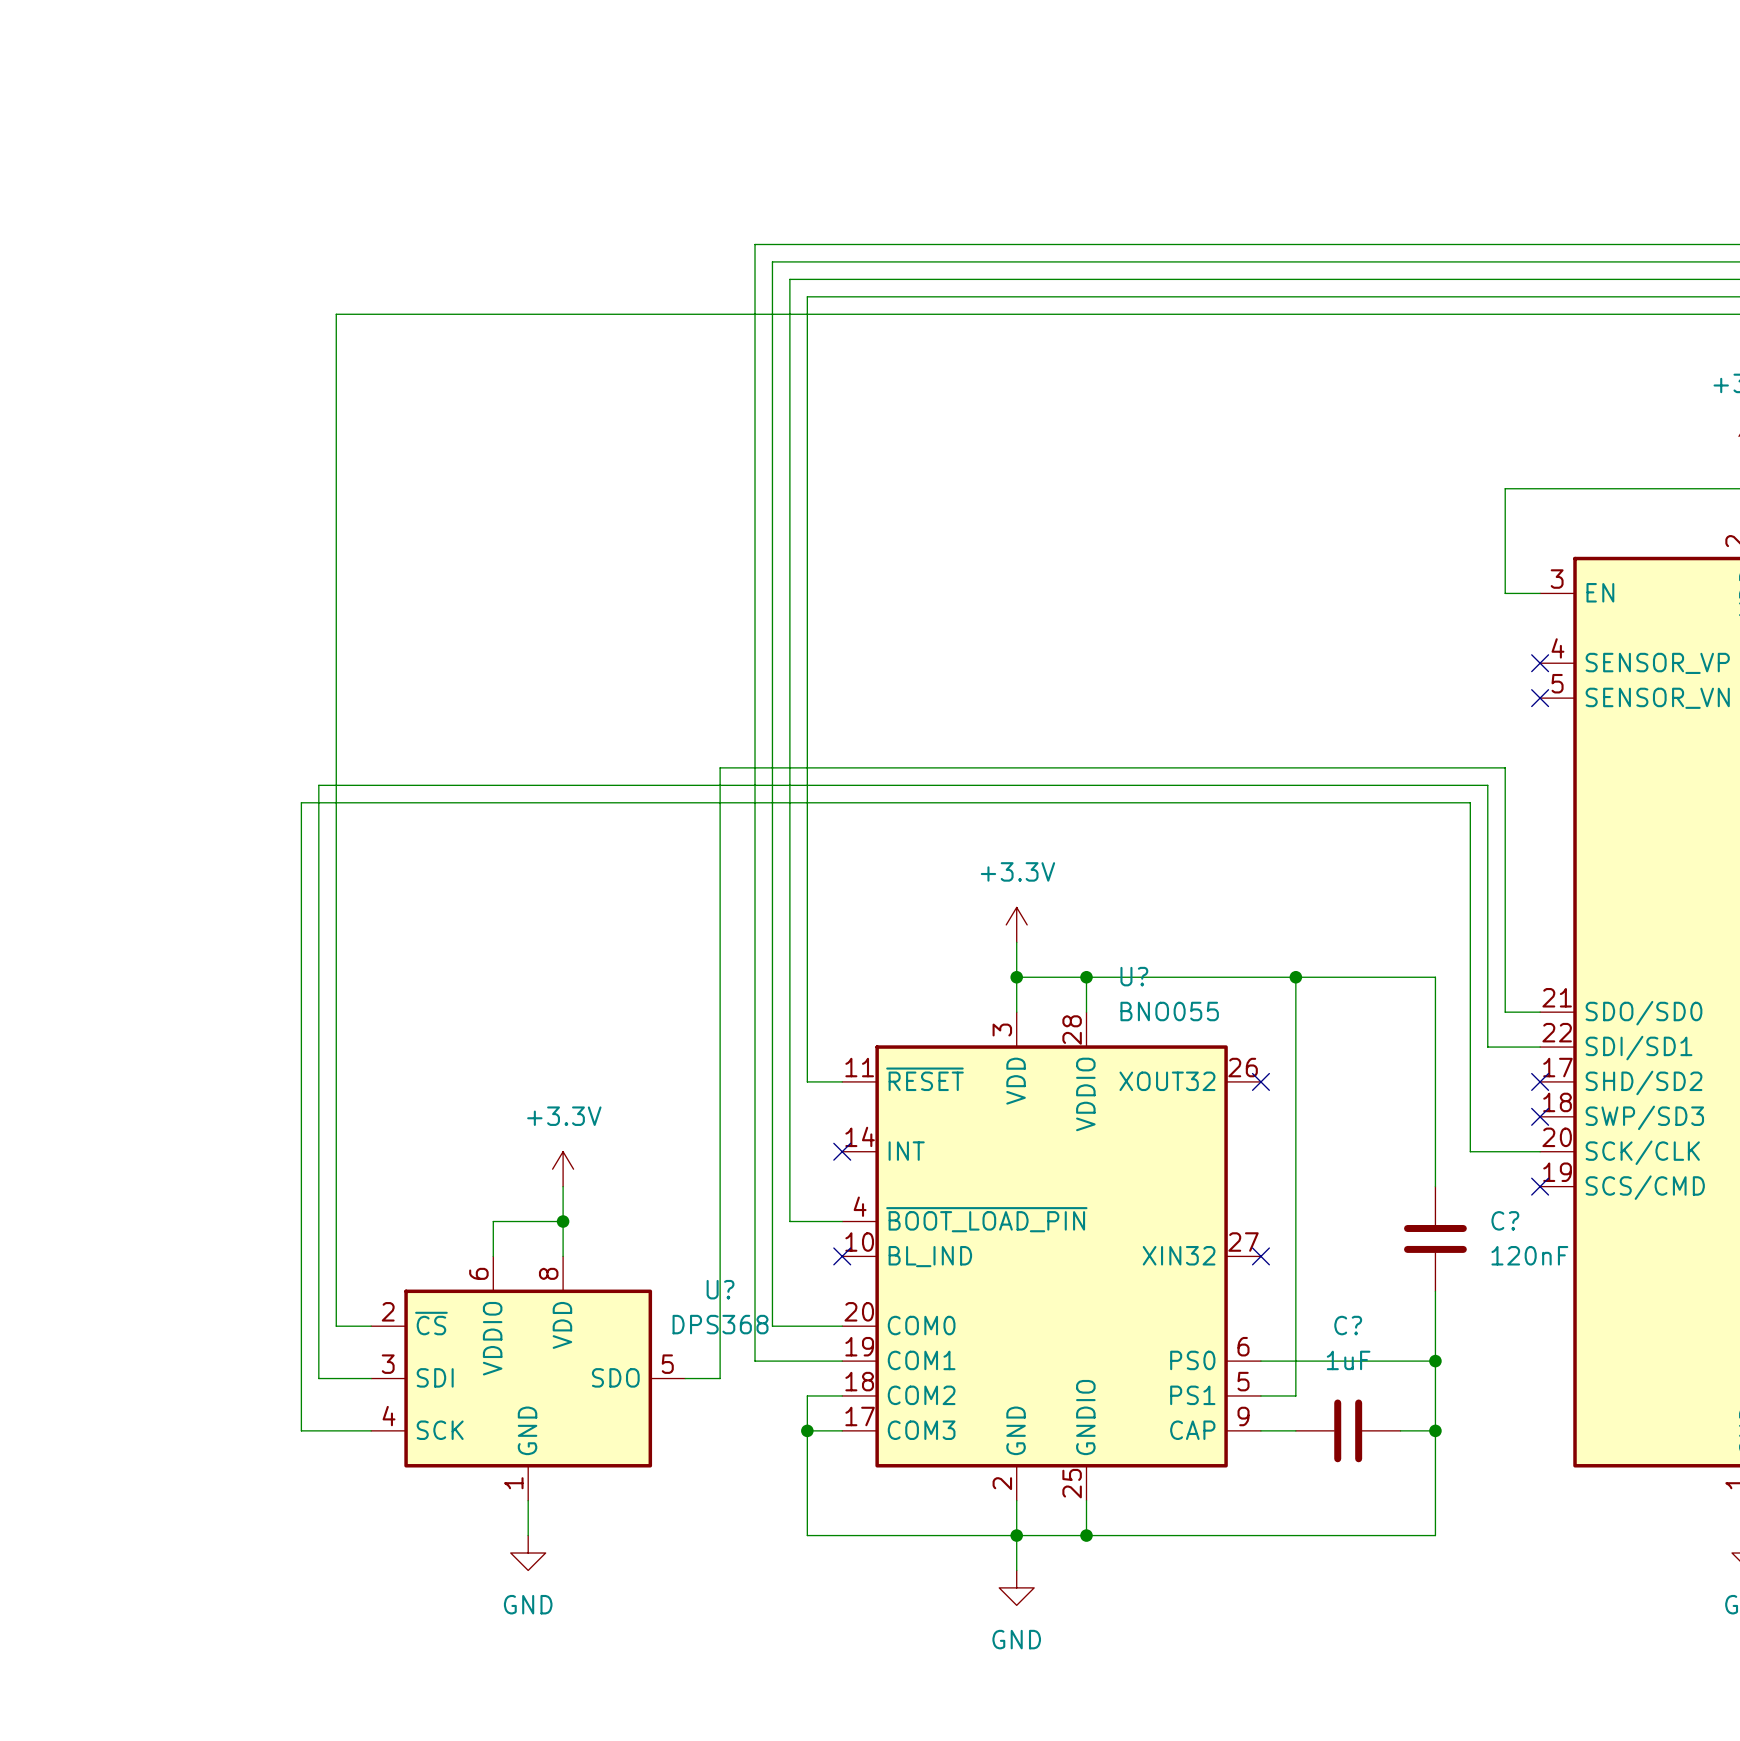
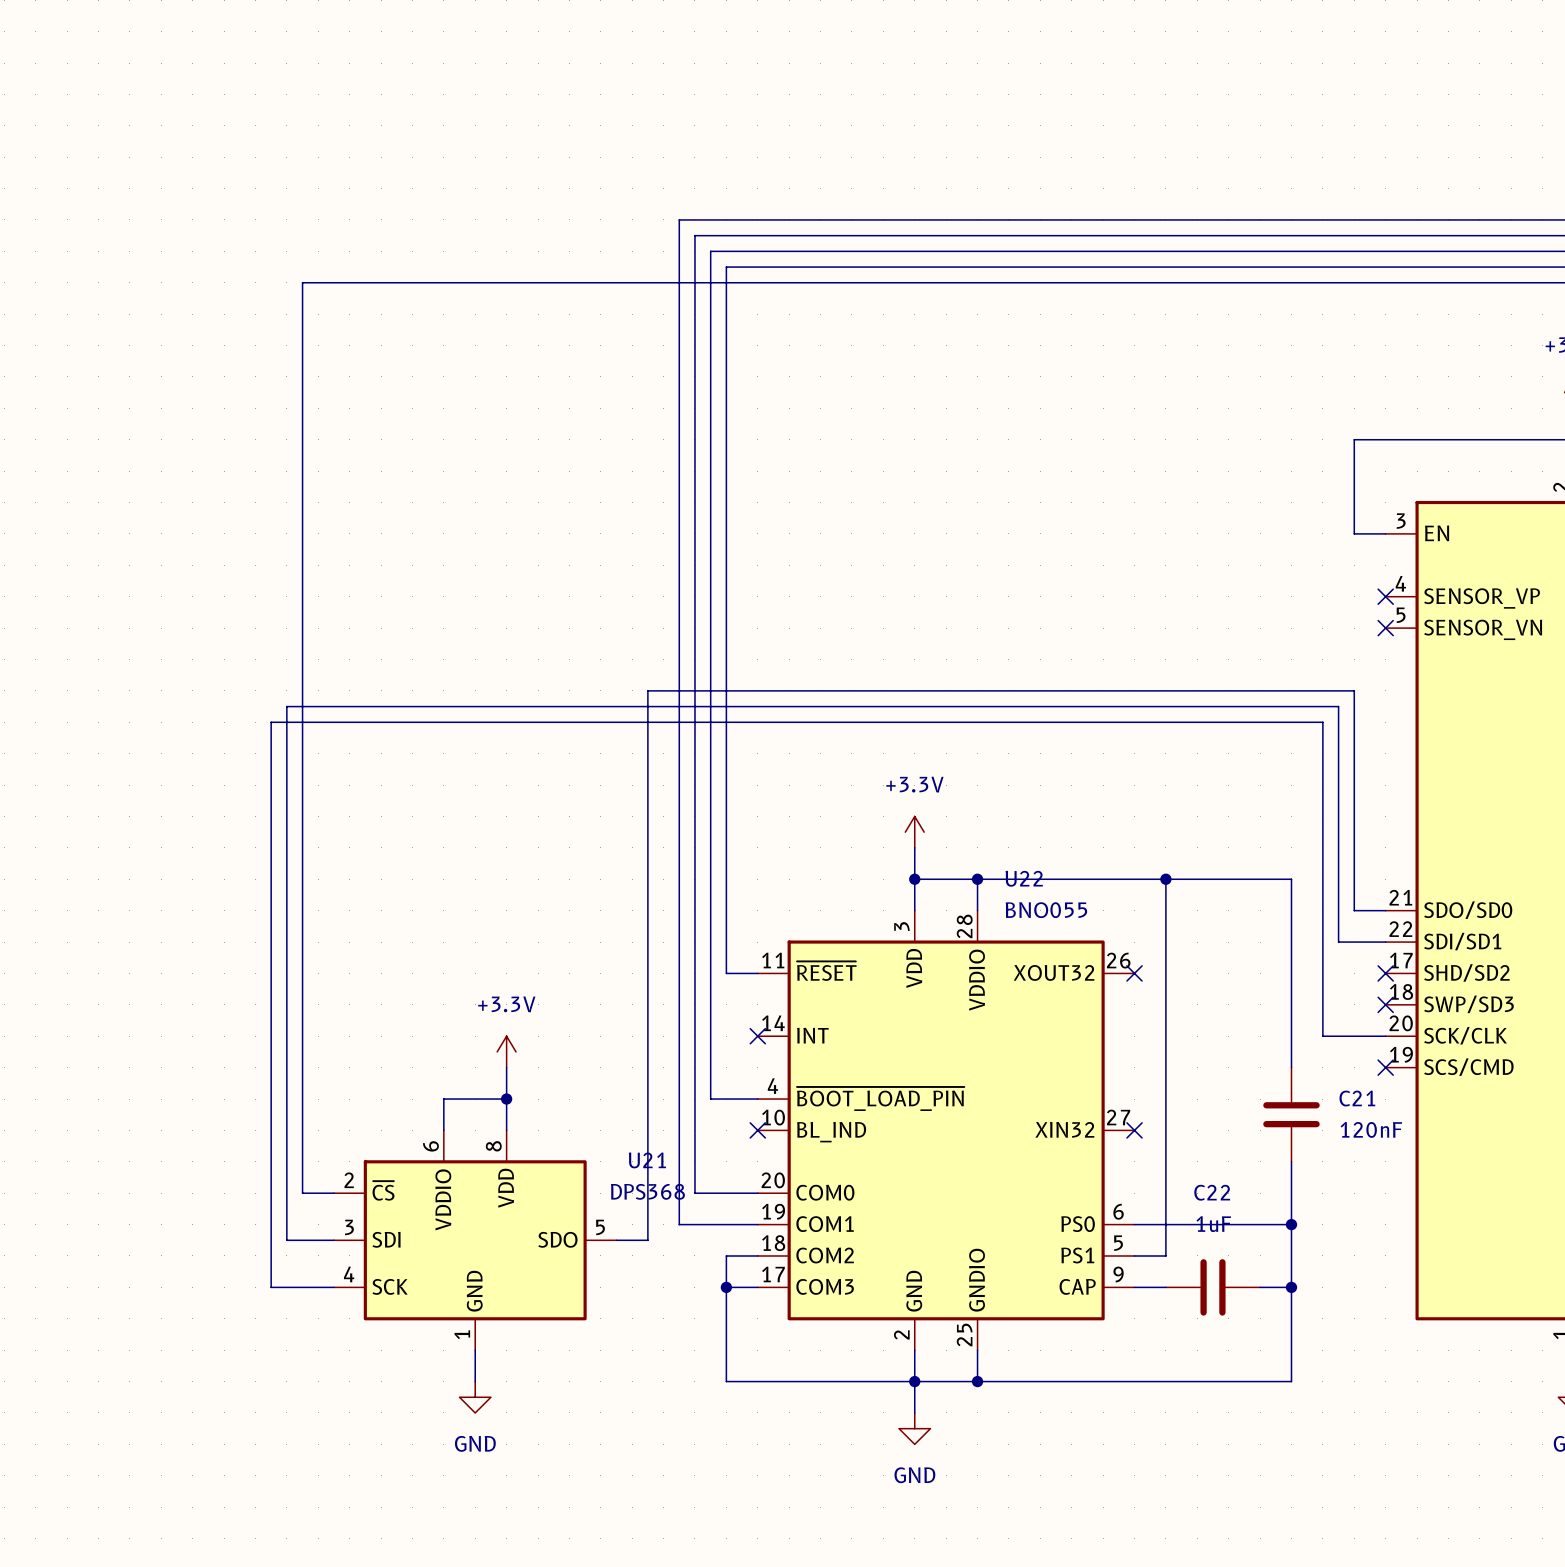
U? name: U? (1134, 976) -> U22 (1024, 878)
C? name: C? (1505, 1220) -> C21 (1357, 1098)
U? name: U? (720, 1289) -> U21 (647, 1160)
C? name: C? (1348, 1325) -> C22 (1212, 1192)

